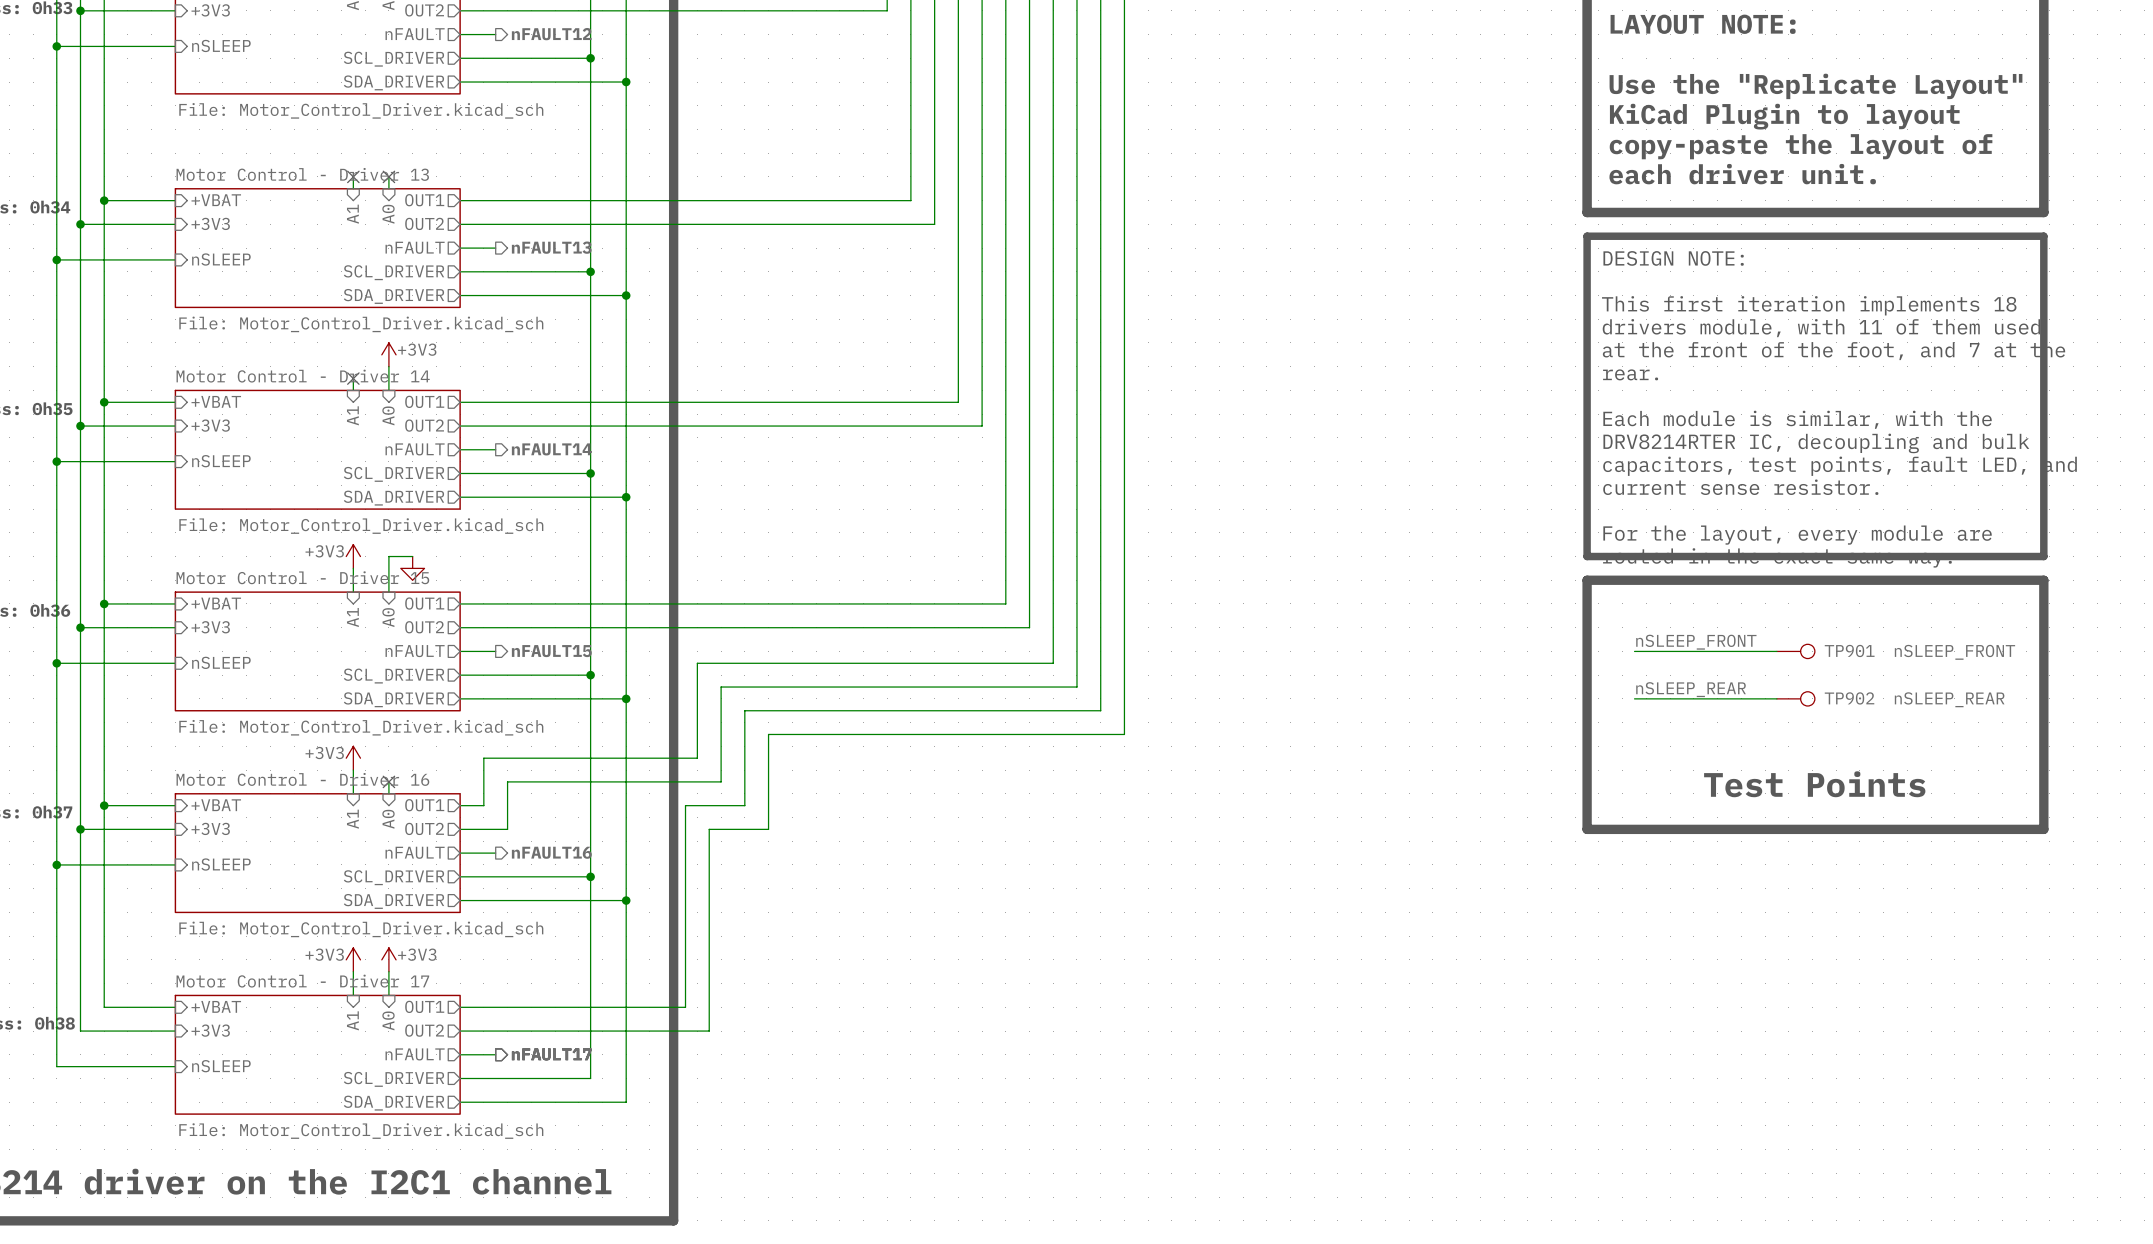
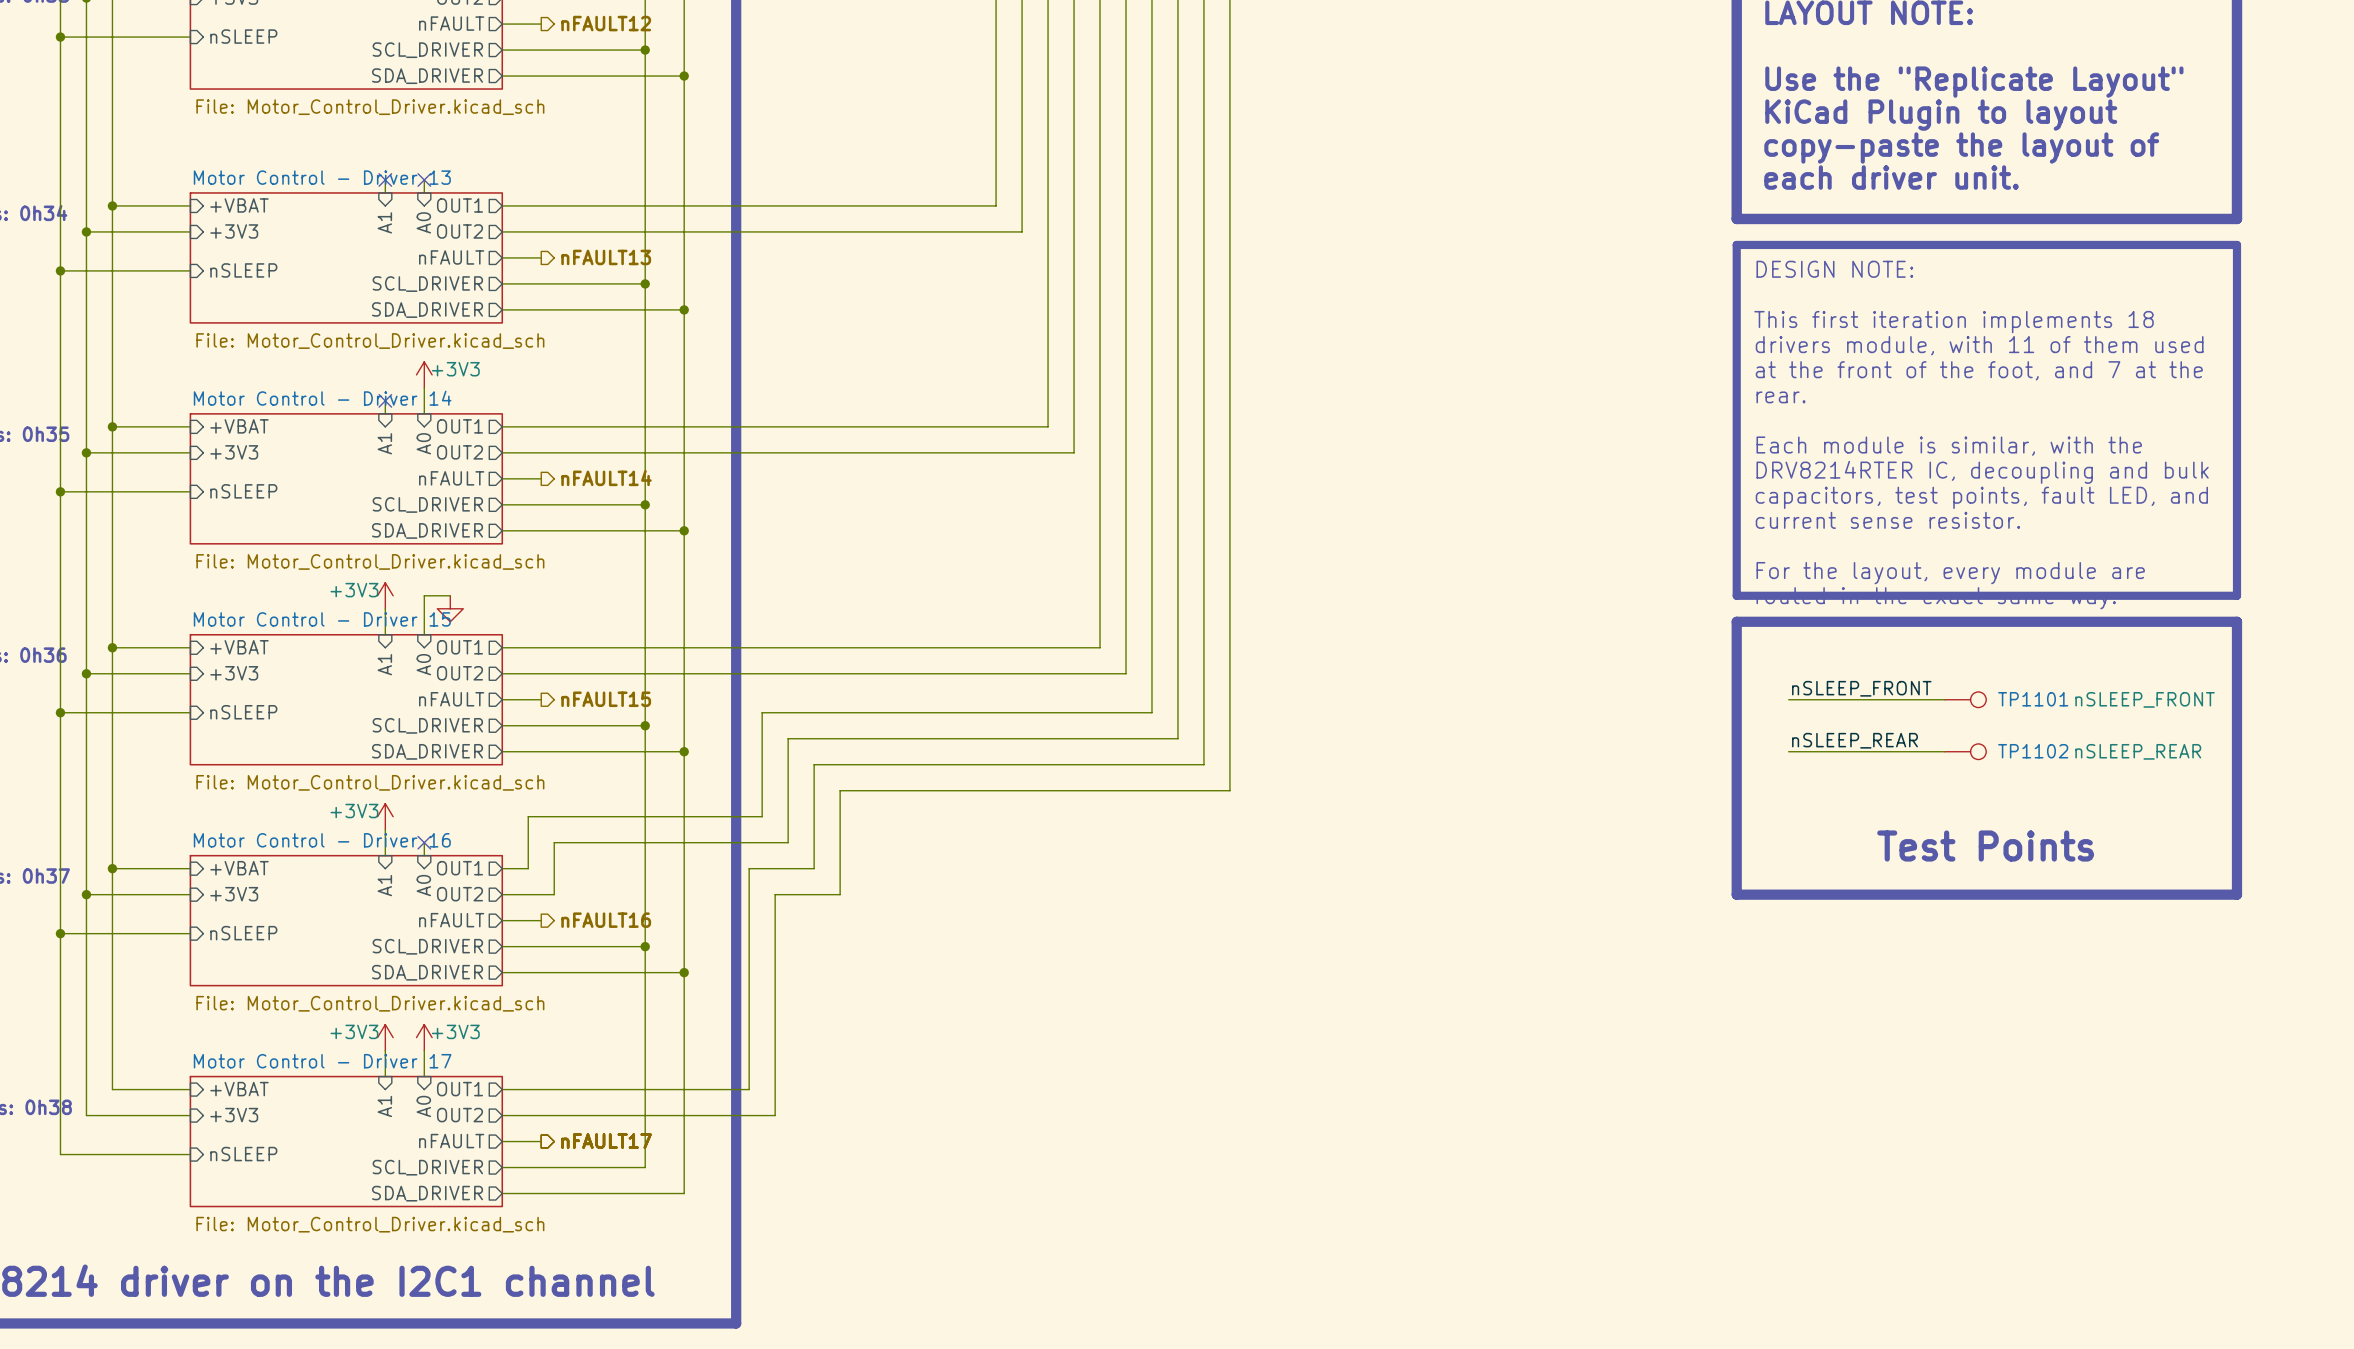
TP901 name: TP901 (1849, 650) -> TP1101 (2033, 699)
TP902 name: TP902 (1849, 698) -> TP1102 (2033, 751)

